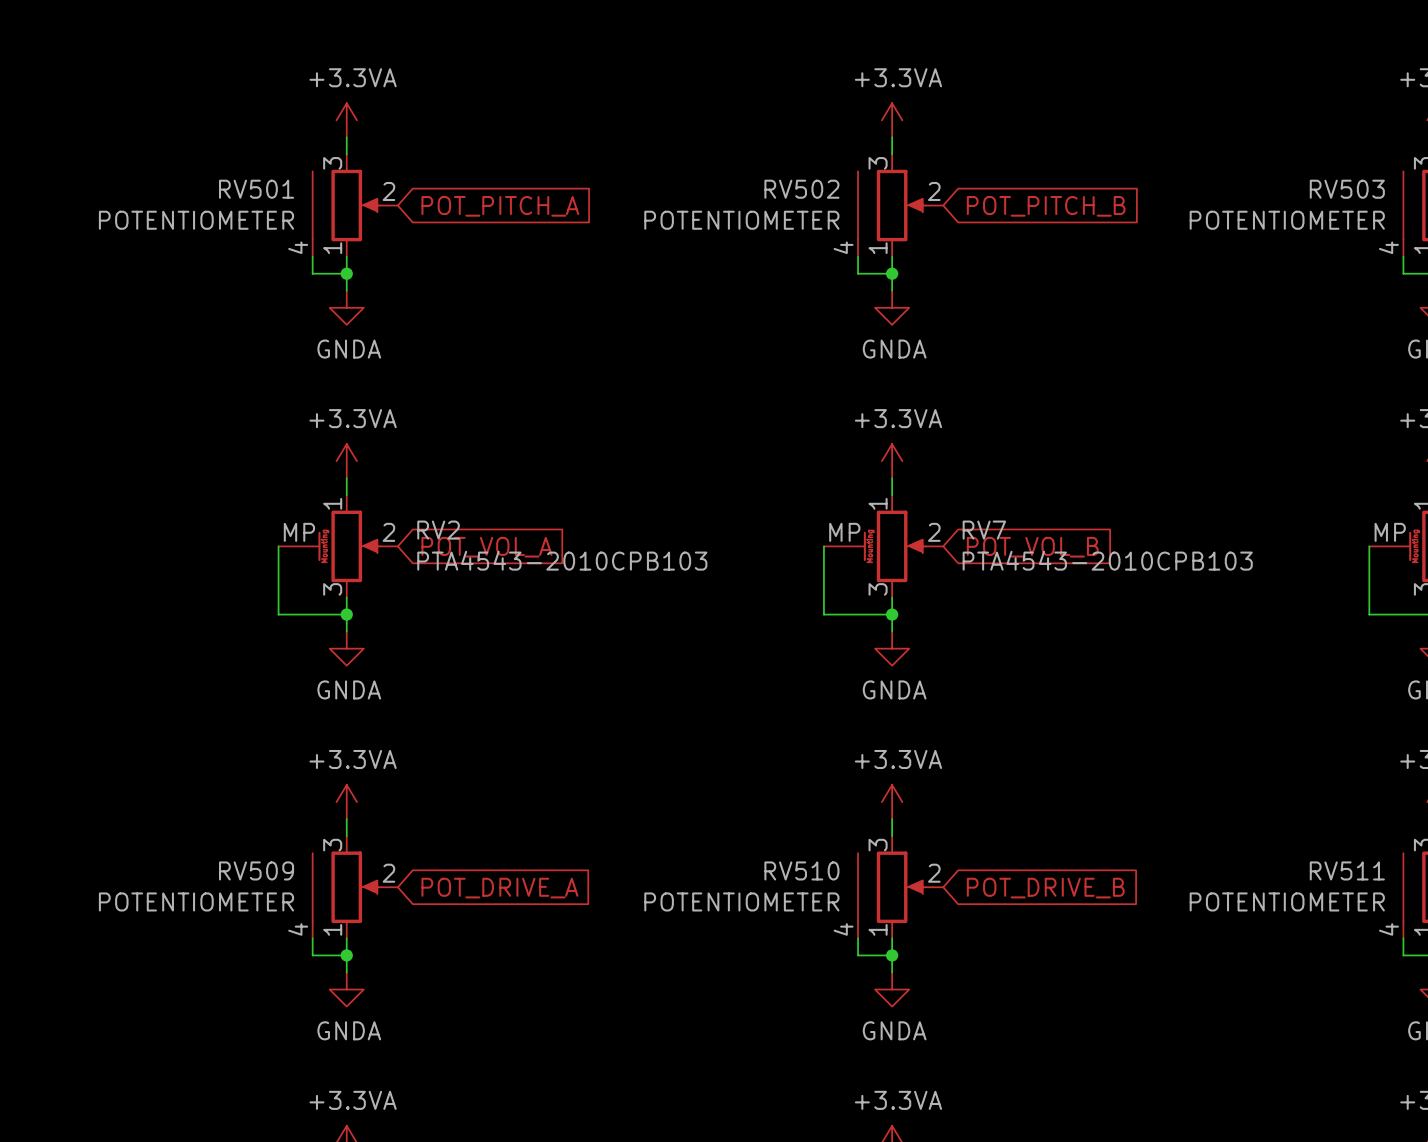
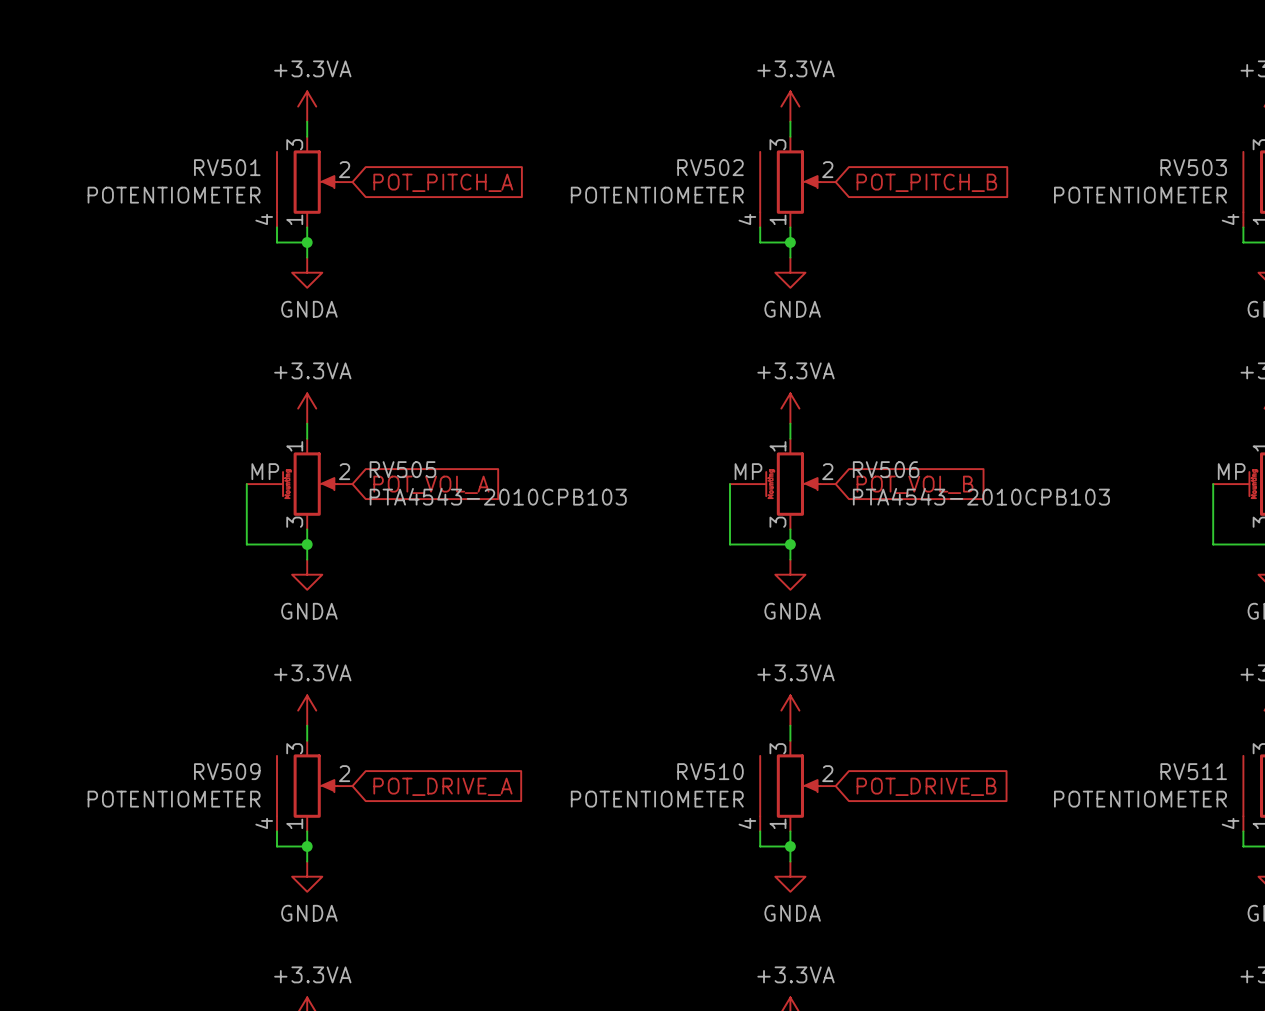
RV2 name: RV2 (438, 530) -> RV505 (402, 469)
RV7 name: RV7 (984, 530) -> RV506 (886, 469)

